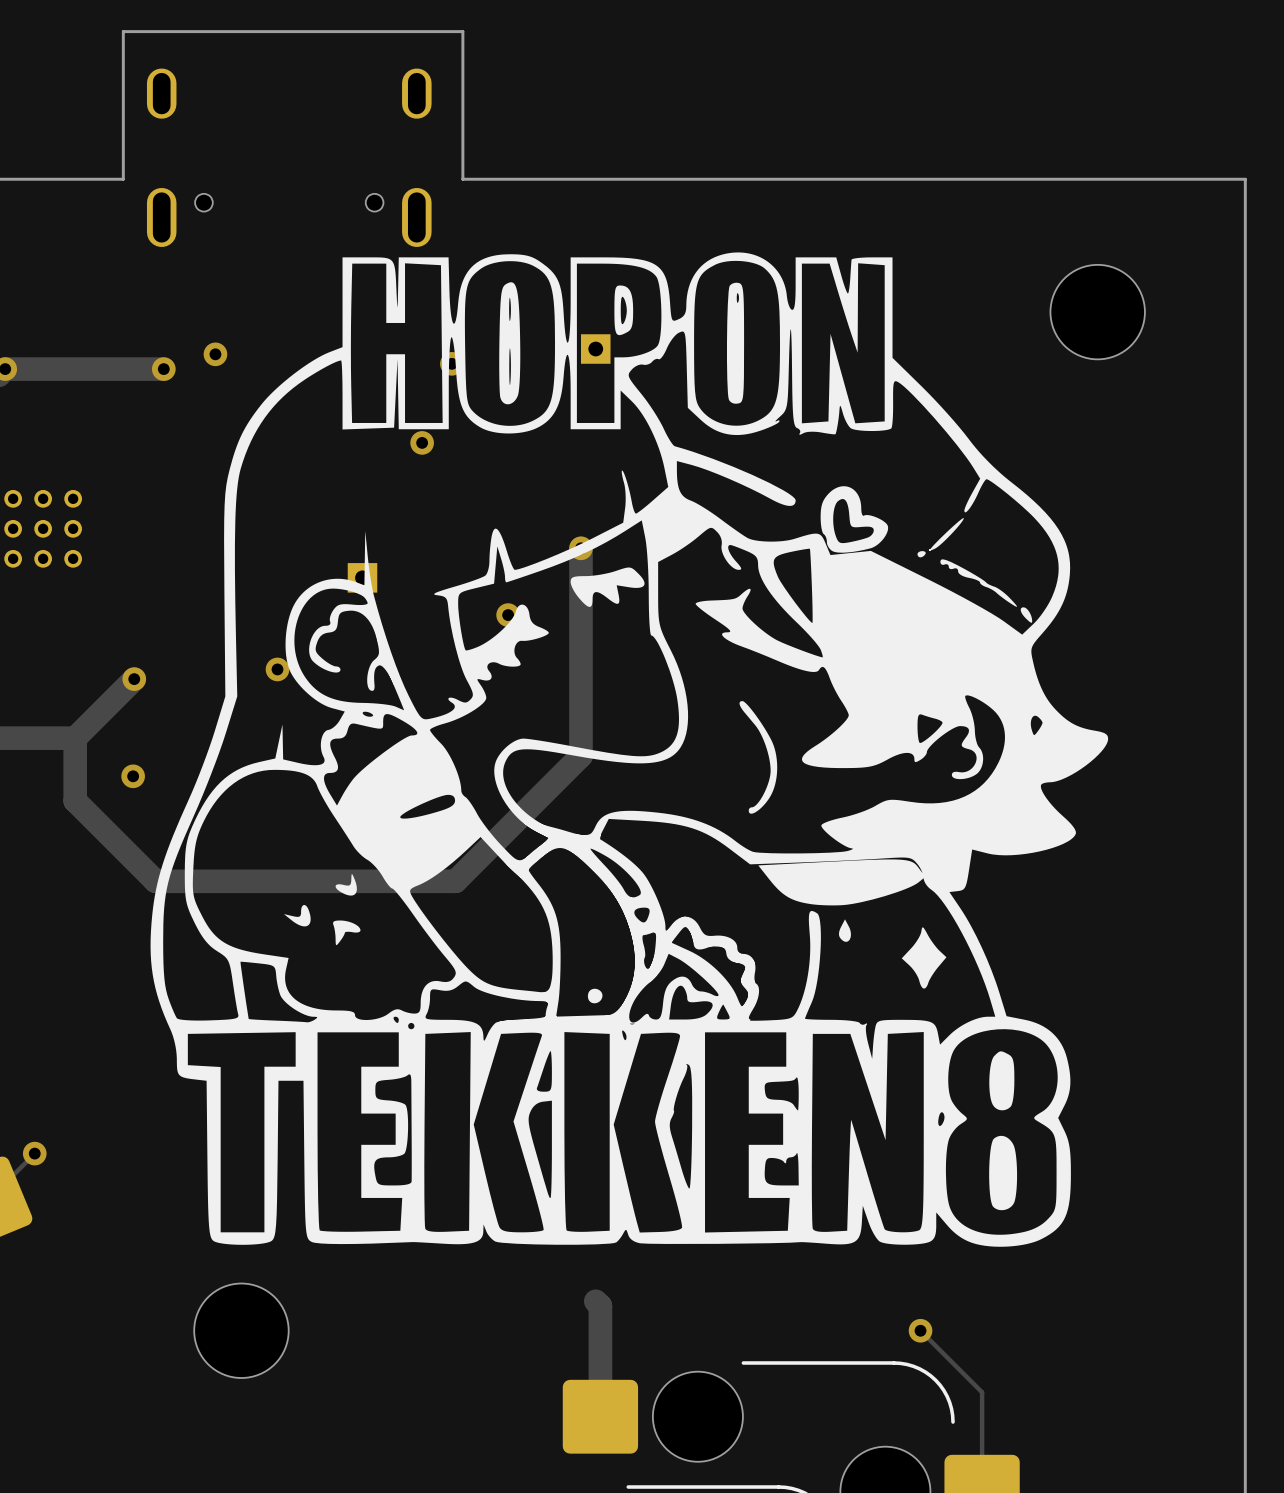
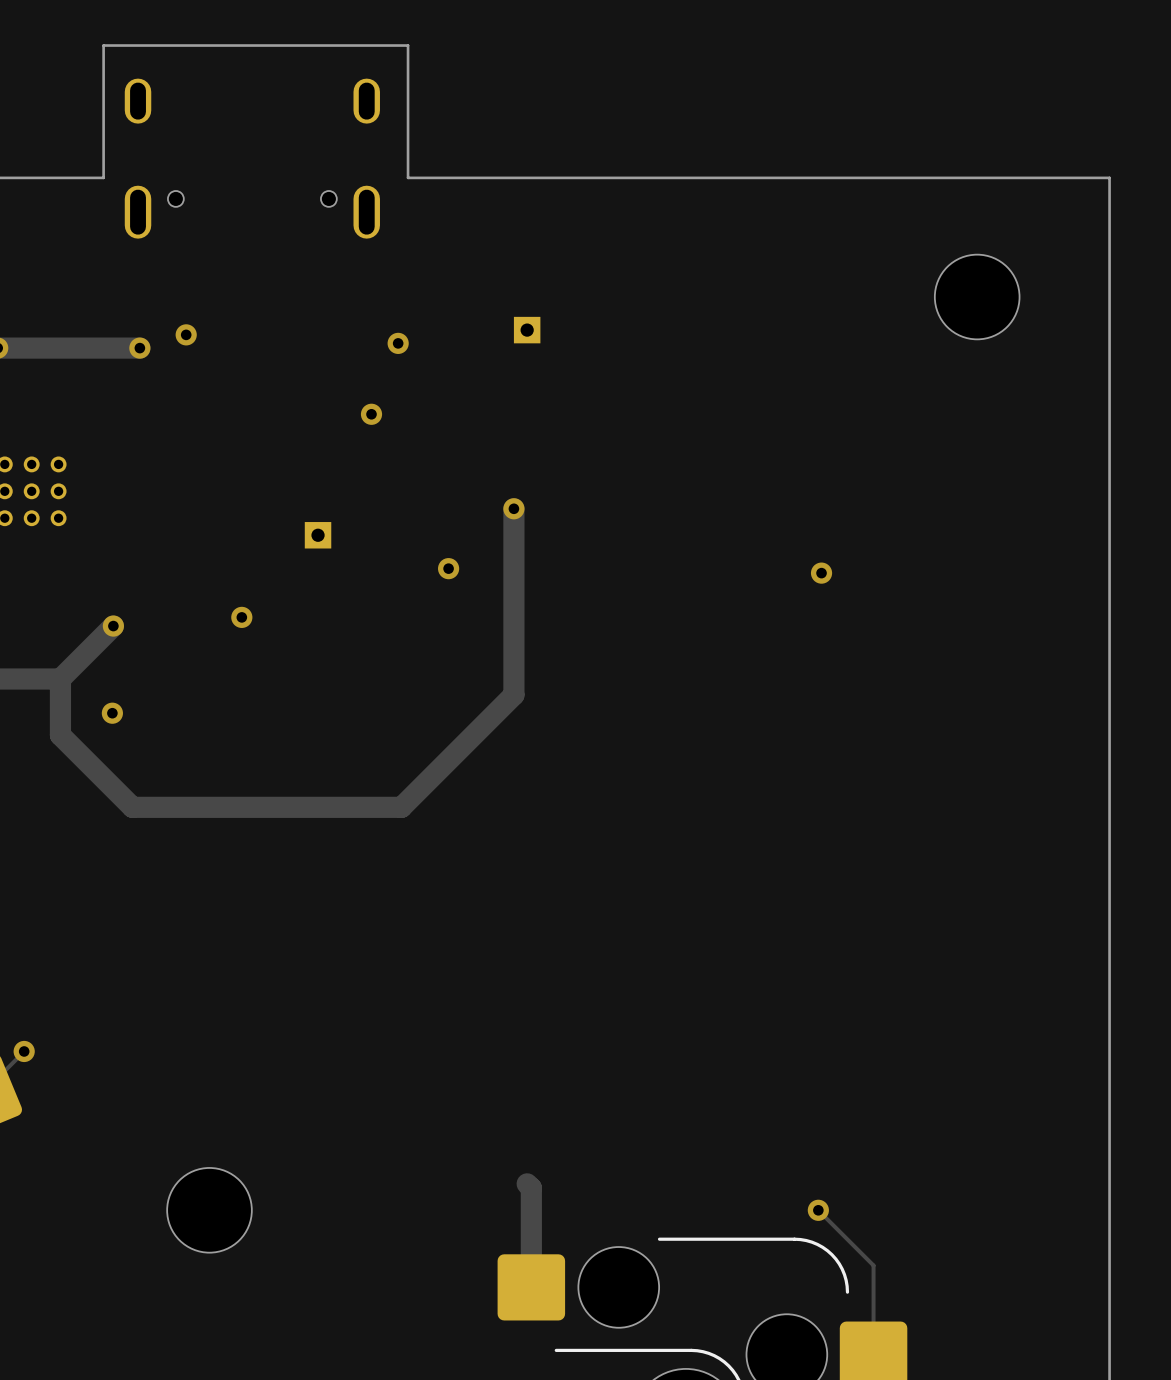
drawing: [150, 252, 1109, 1247] -> none

